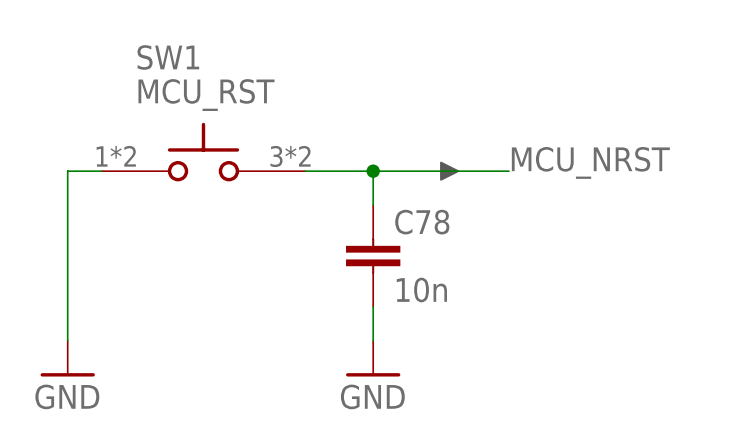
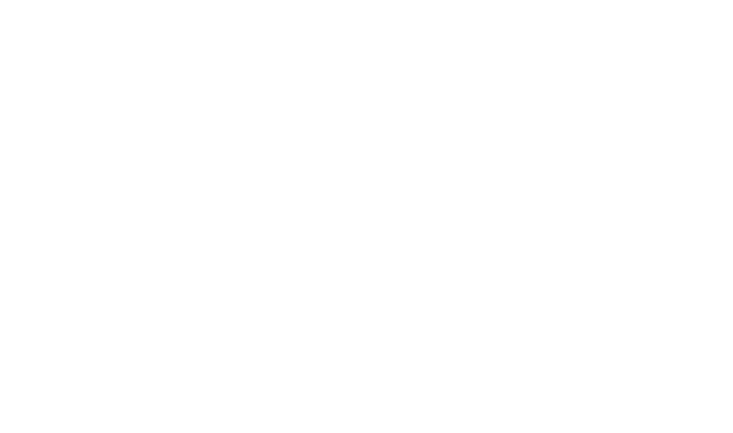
SW1: MCU_RST (203, 152) -> none
label: MCU_NRST (590, 162) -> none
wire: (101, 171) (67, 171) (67, 340) -> none
wire: (305, 171) (508, 171) -> none
wire: (373, 171) (373, 205) -> none
junction: (373, 171) -> none
part: (449, 171) -> none
C78: 10n (373, 256) -> none
wire: (373, 306) (373, 340) -> none
power symbol: GND (67, 358) -> none
power symbol: GND (373, 358) -> none

